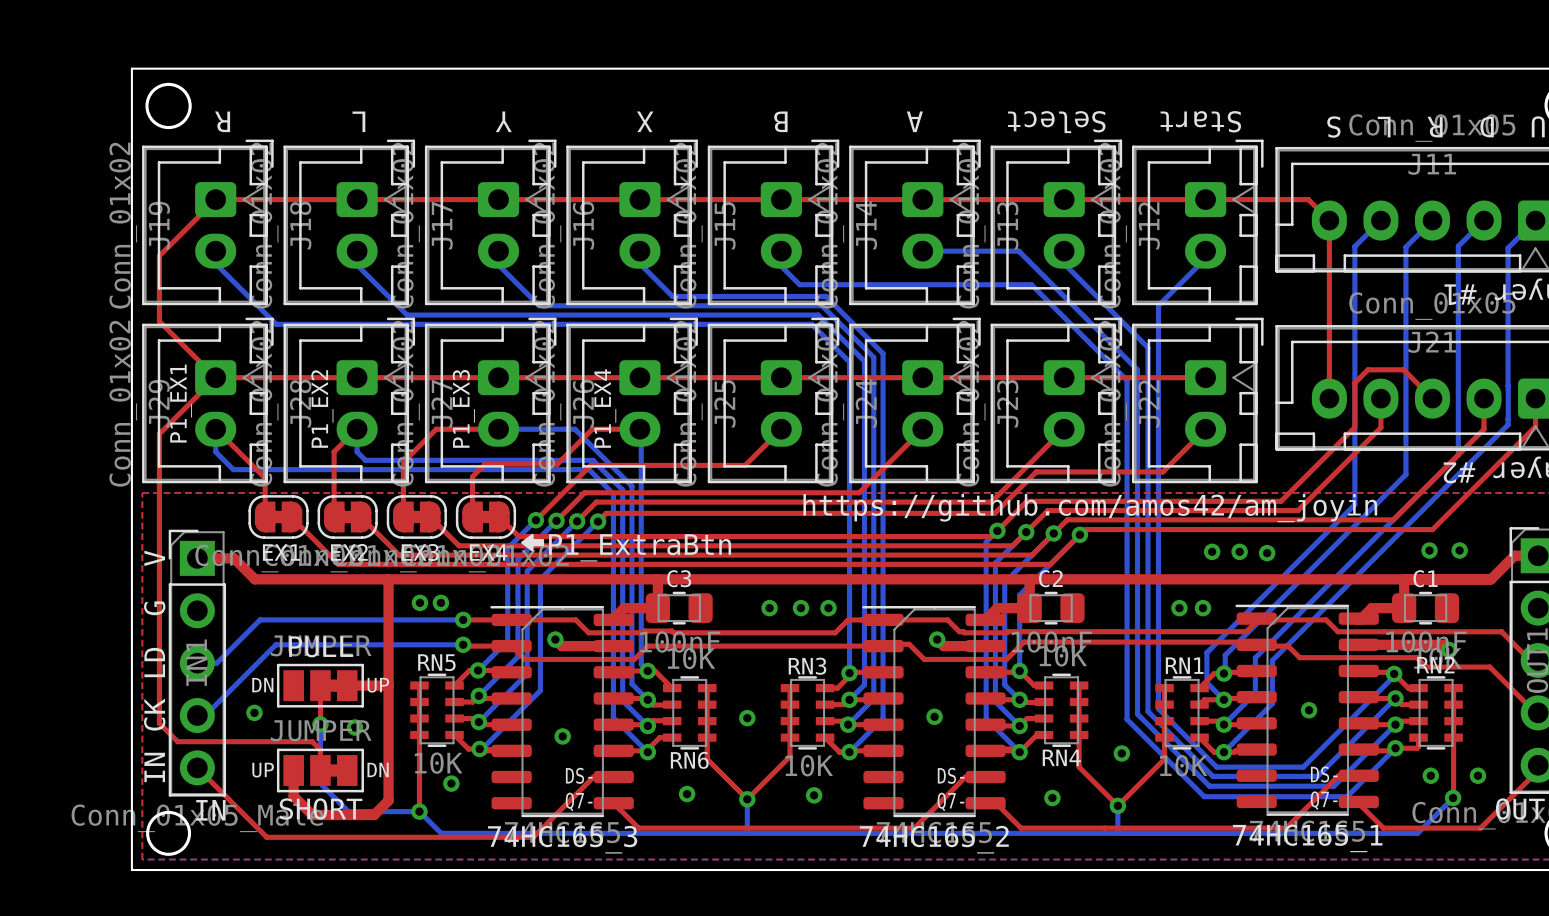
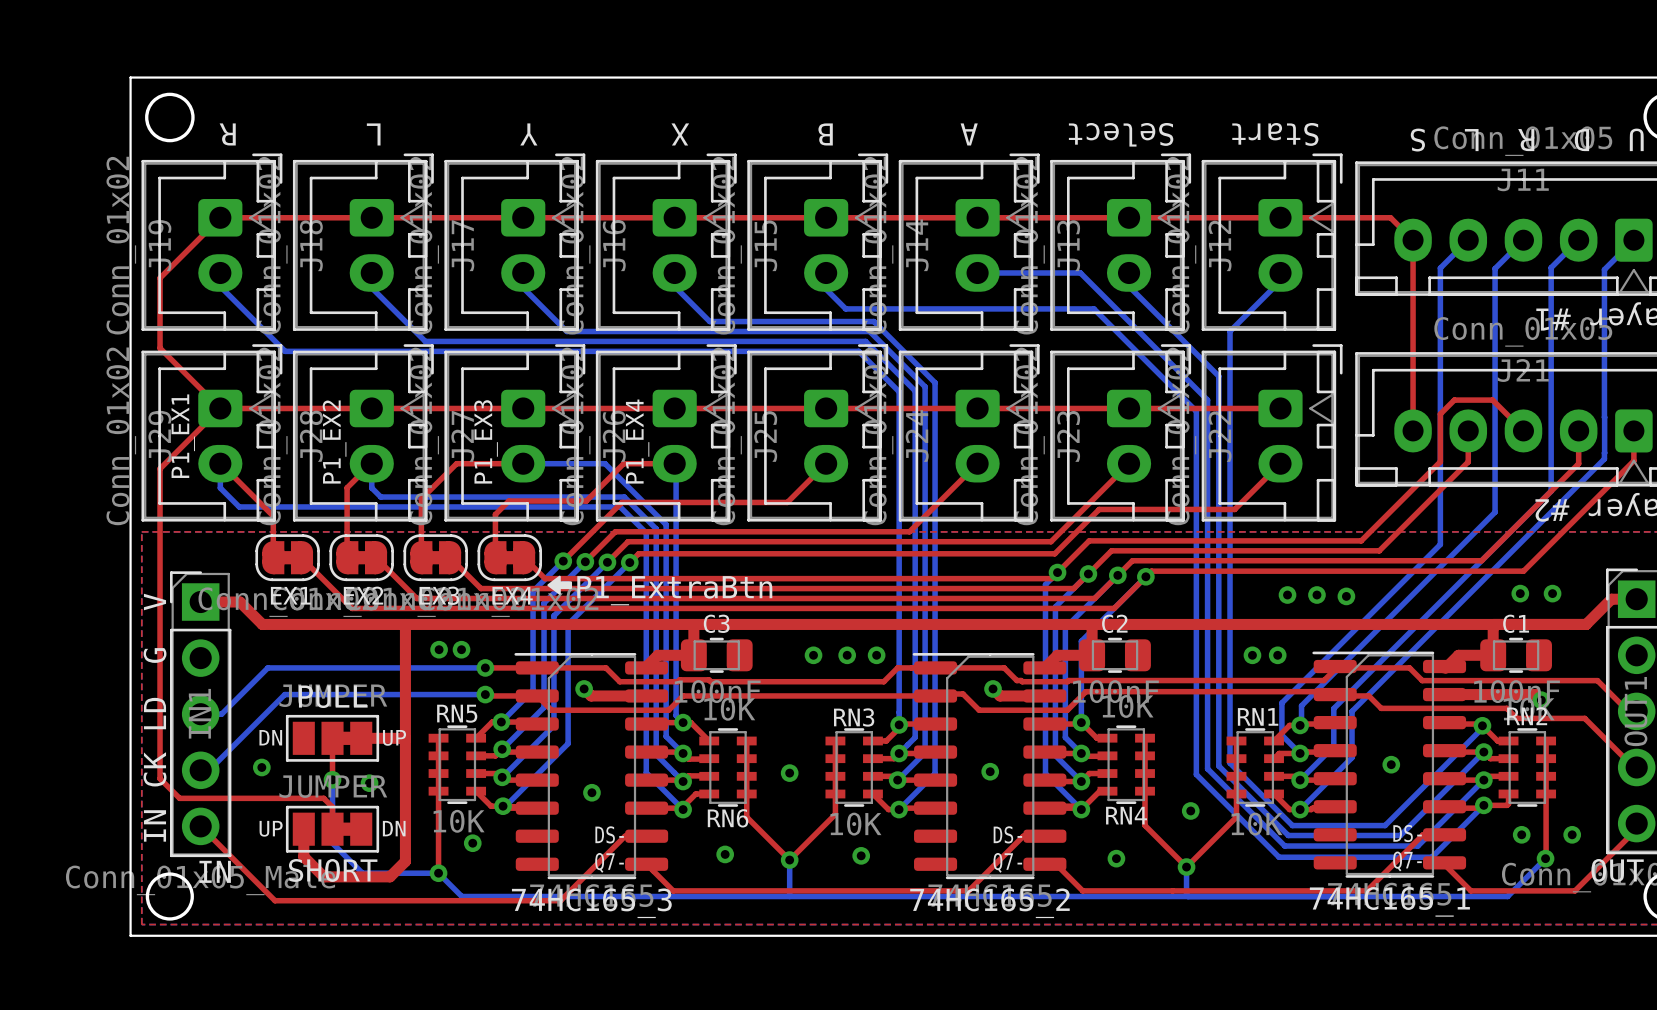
text: https://github.com/amos42/am_joyin (1090, 508) -> none

